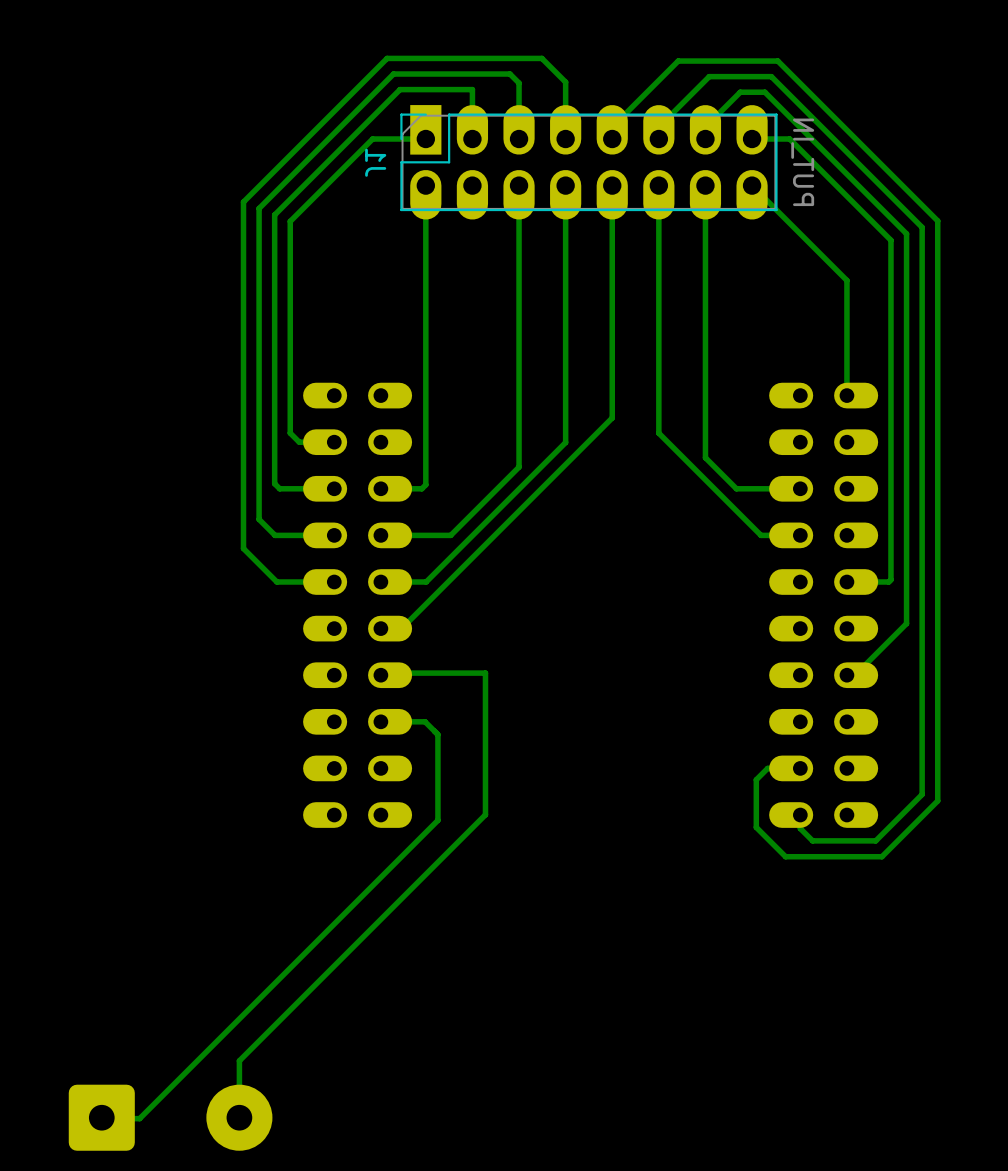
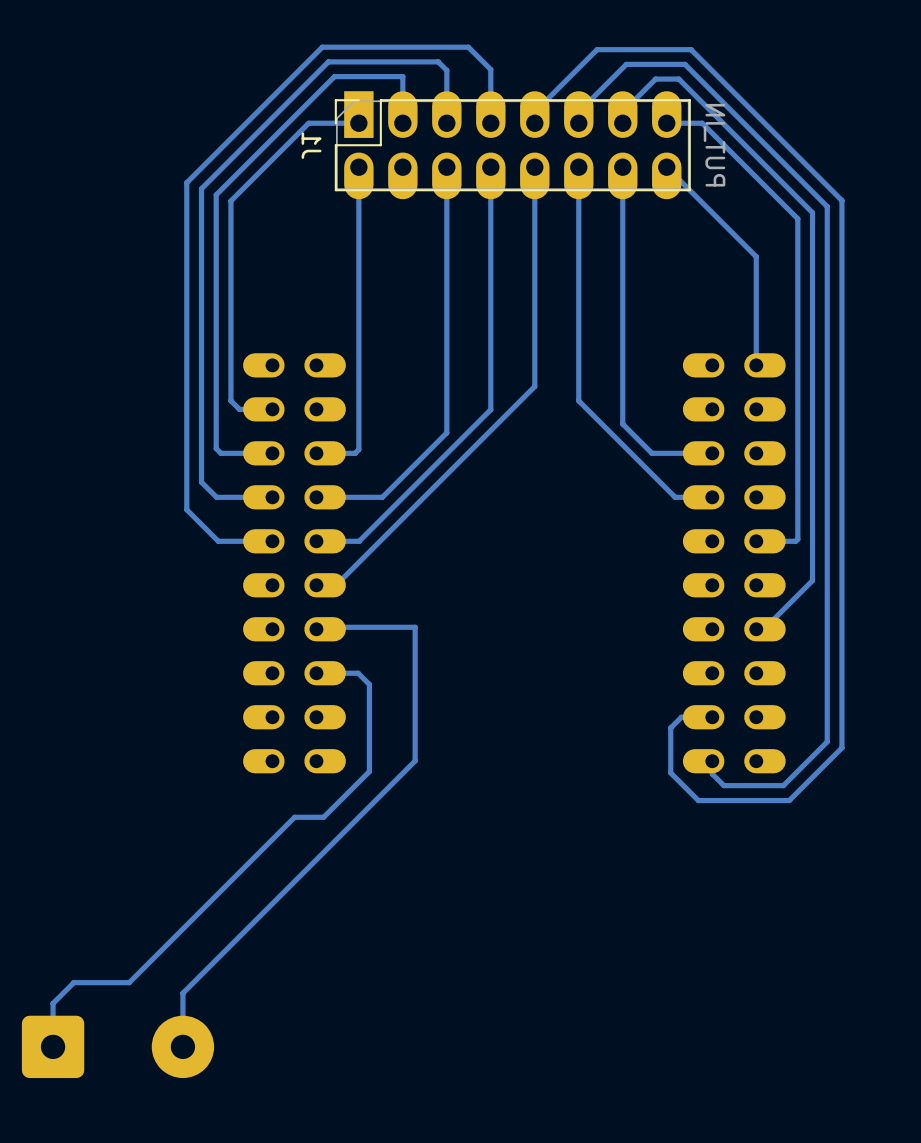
track: (437, 733) (437, 820) (139, 1118) (101, 1117) -> (369, 684) (369, 771) (323, 817) (294, 817) (129, 982) (73, 982) (53, 1003) (53, 1046)

